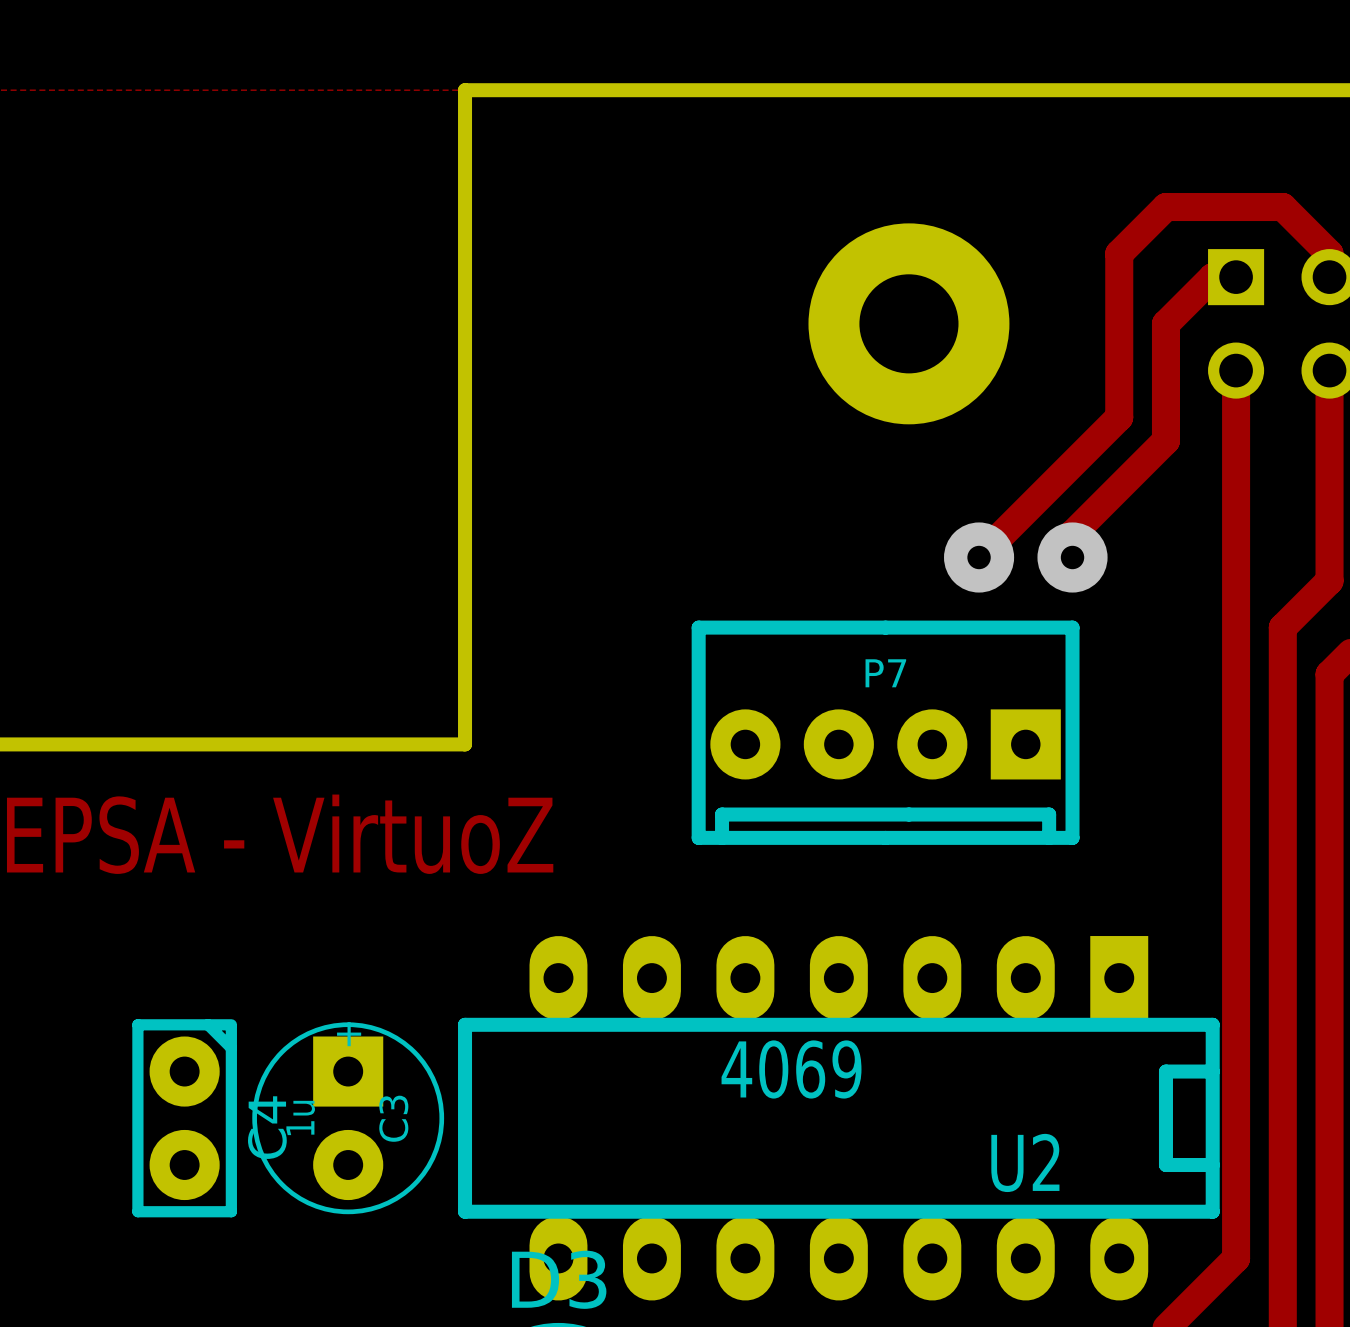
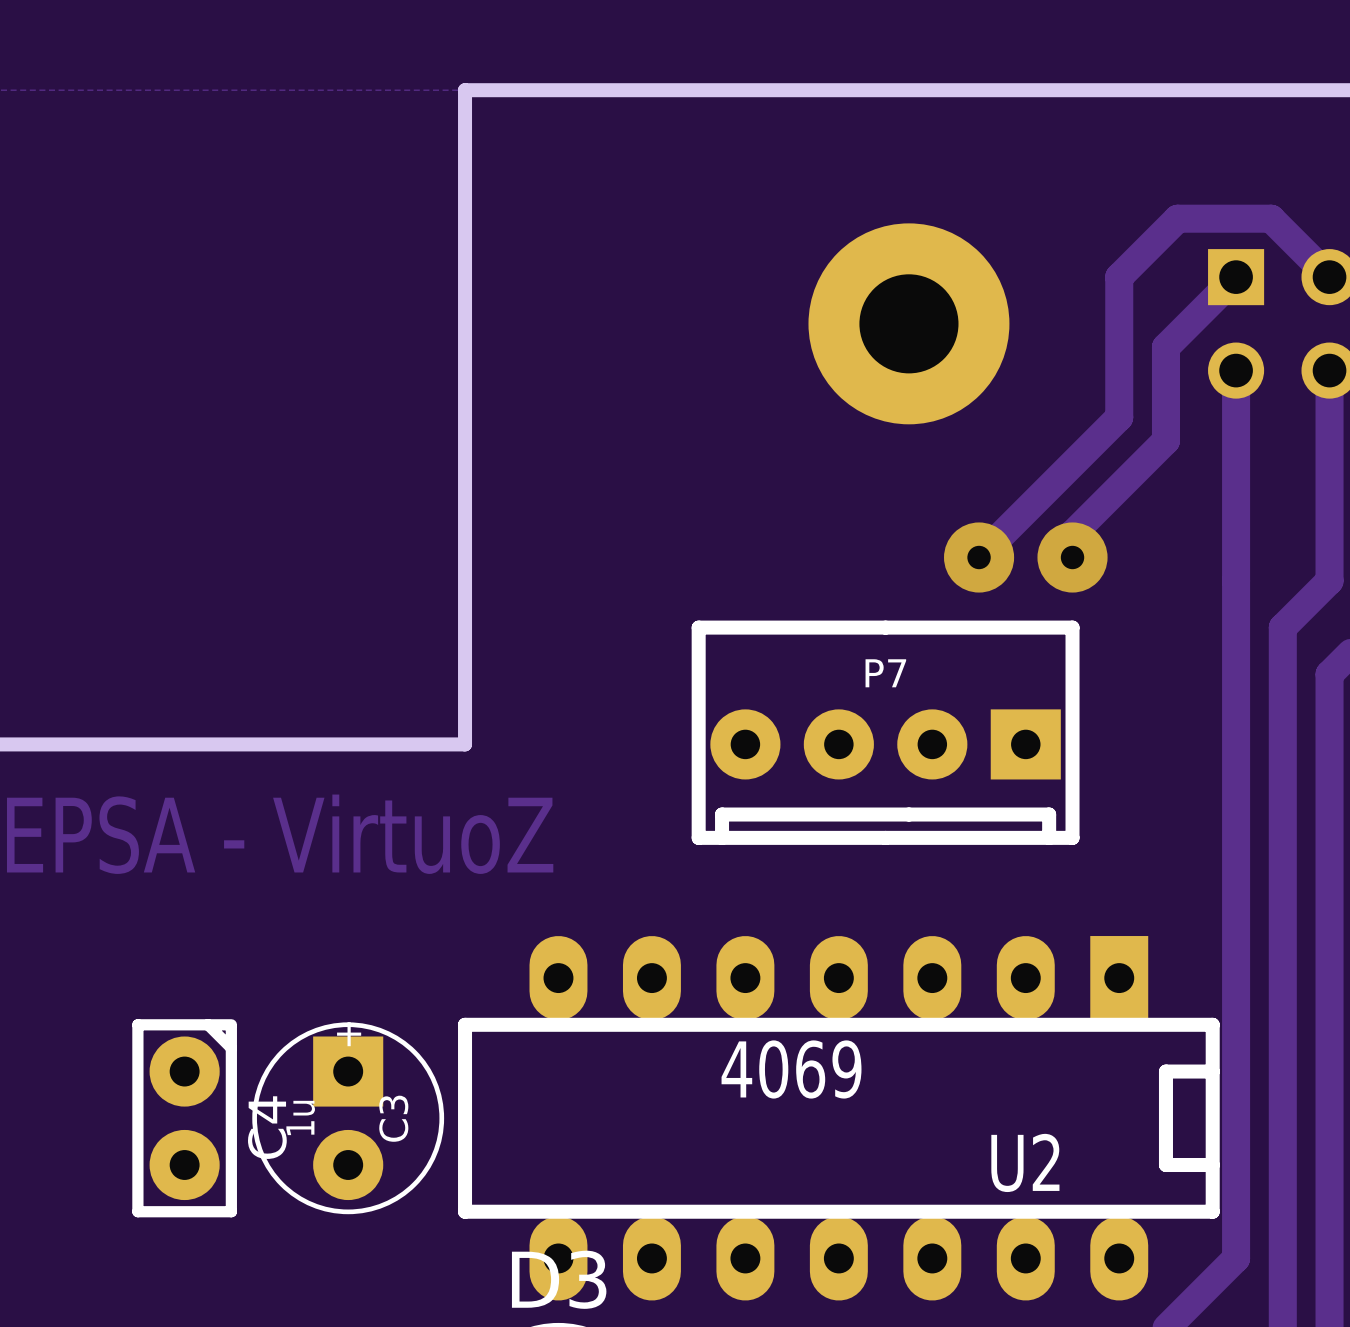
track: (1119, 277) (1119, 253) (1165, 207) (1282, 207) (1329, 253) (1329, 277) -> (1119, 277) (1177, 218) (1271, 218) (1329, 277)
track: (1236, 277) (1212, 277) (1165, 323) (1165, 347) -> (1236, 277) (1165, 347)

